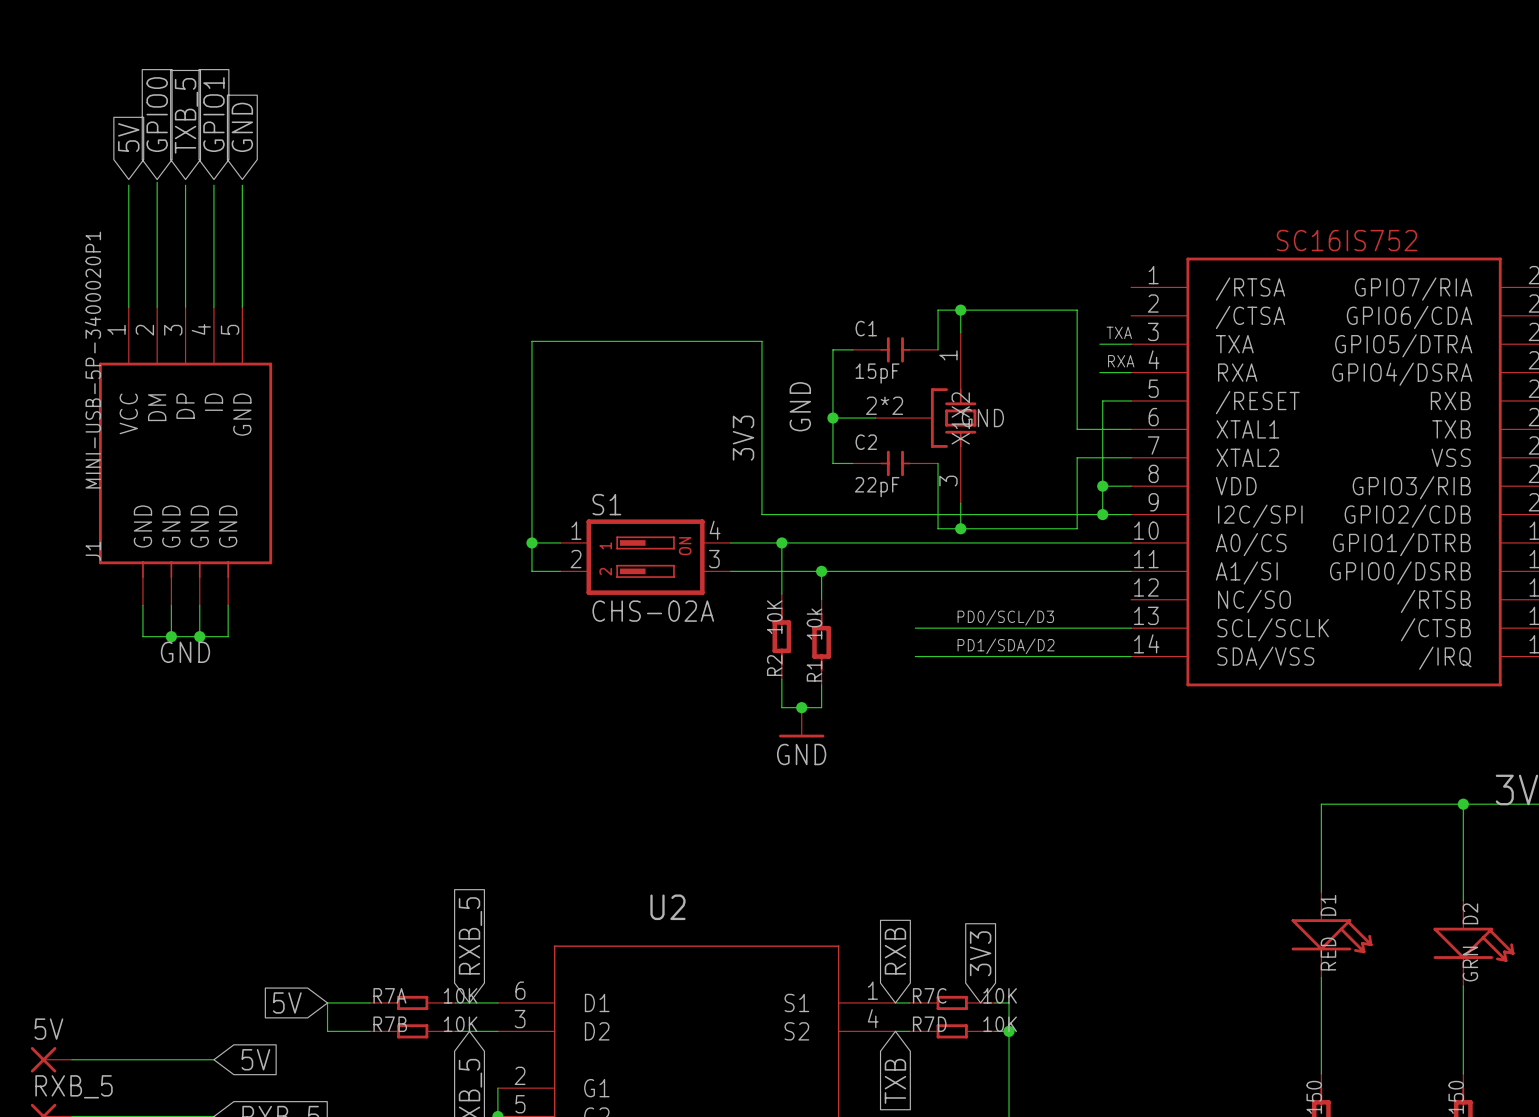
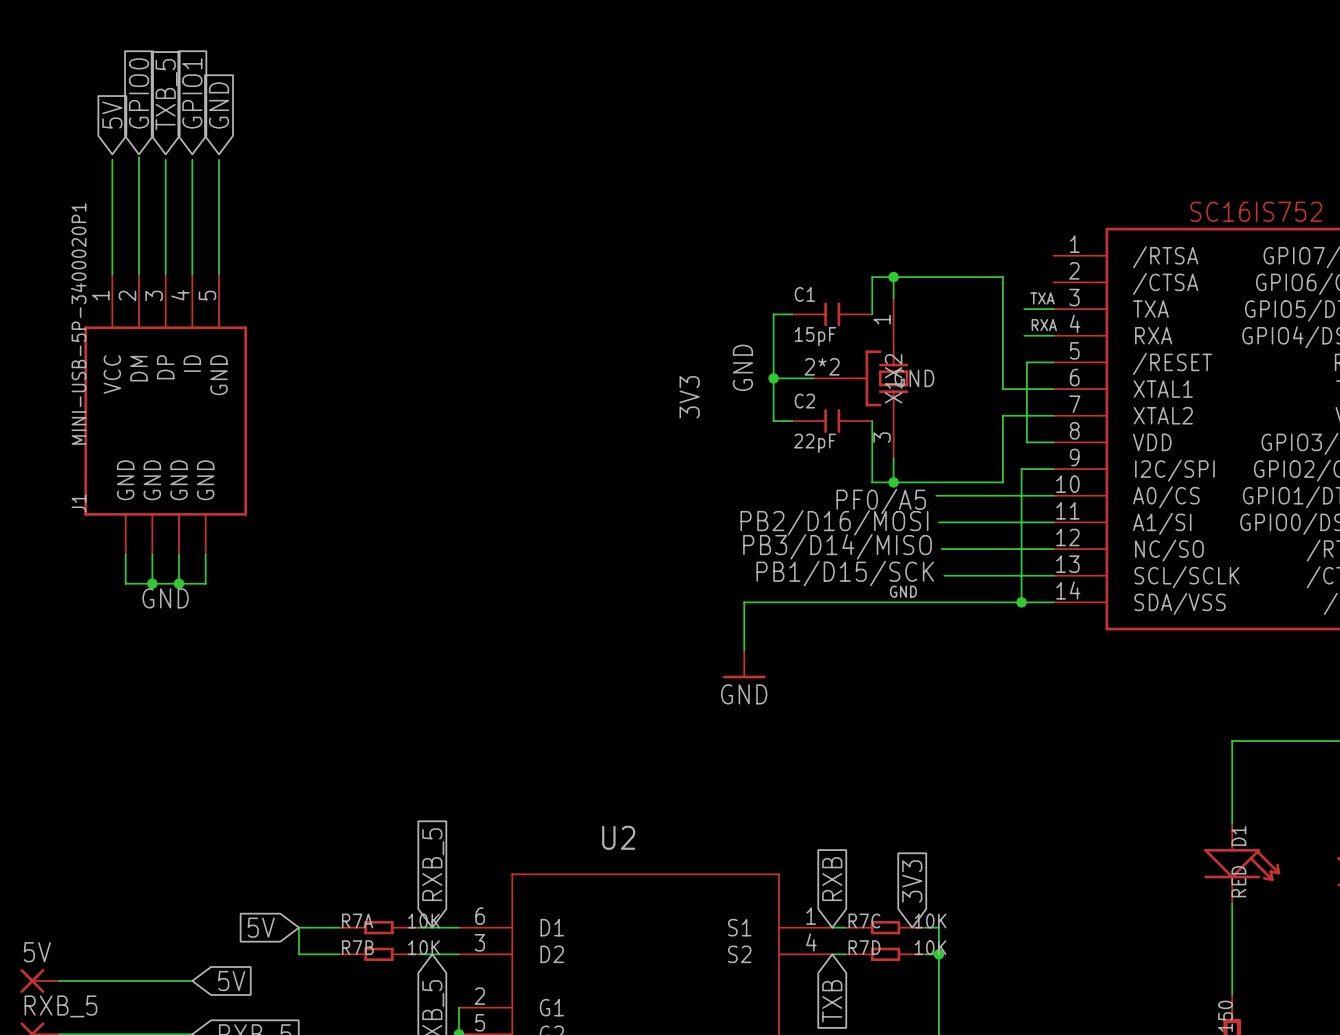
wire: (1102, 486) (1102, 514) -> none
junction: (1102, 486) -> none
wire: (1097, 514) (761, 514) (761, 341) (531, 341) (531, 571) (560, 571) -> (1021, 469) (1021, 602)
junction: (1102, 514) -> none
wire: (531, 542) (560, 542) -> none
junction: (531, 542) -> none
wire: (730, 542) (1006, 542) -> none
wire: (781, 542) (781, 594) -> none
junction: (781, 542) -> none
label: none -> PF0/A5 (881, 501)
S1: CHS-02A (645, 557) -> none
wire: (730, 571) (1009, 571) -> none
wire: (821, 571) (821, 599) -> none
junction: (821, 571) -> none
label: none -> PB2/D16/MOSI (834, 522)
label: none -> PB3/D14/MISO (837, 546)
wire: none -> (941, 549) (1053, 549)
label: PD0/SCL/D3 (1005, 617) -> none
label: none -> PB1/D15/SCK (845, 573)
wire: (915, 628) (1014, 628) -> none
R2: 10K (781, 636) -> none
R1: 10k (821, 642) -> none
label: PD1/SDA/D2 (1006, 646) -> GND (903, 591)
wire: none -> (850, 602) (744, 602) (744, 650)
junction: none -> (1021, 602)
wire: (781, 679) (781, 707) (821, 707) (821, 684) -> none
junction: (801, 707) -> none

